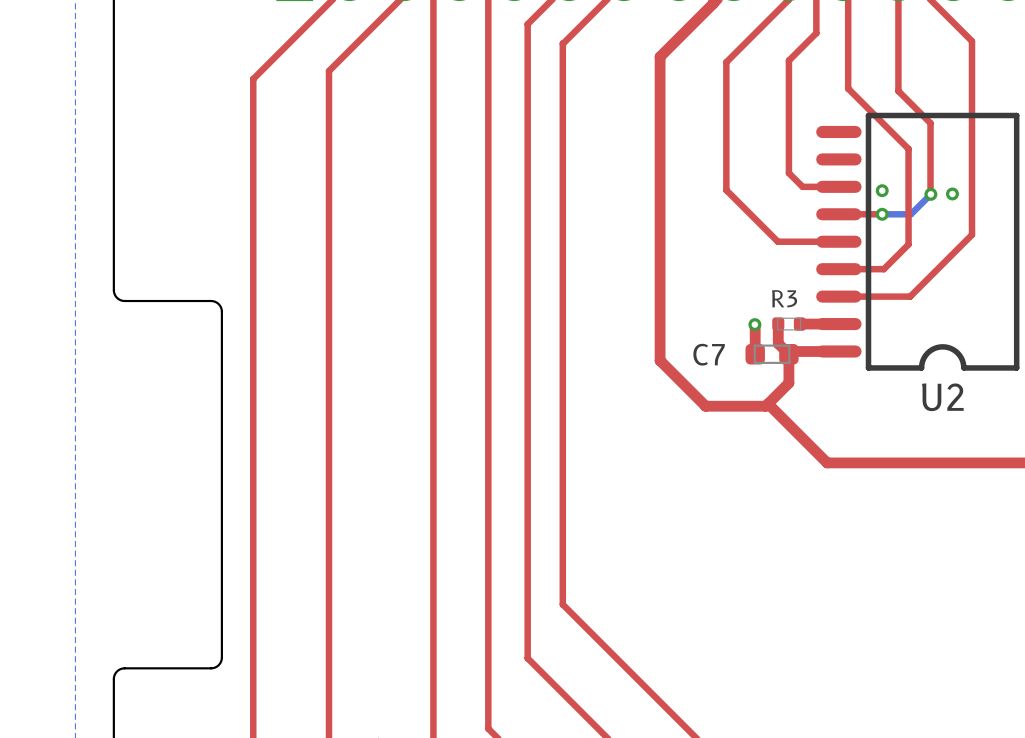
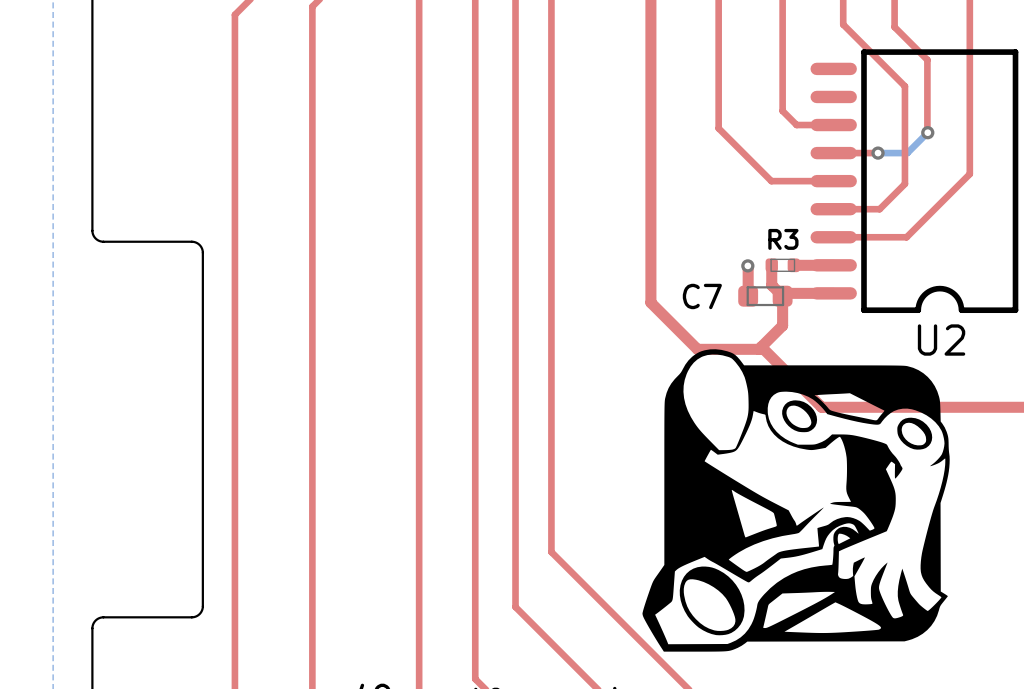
via: (882, 190) -> none
via: (952, 193) -> none
drawing: none -> [642, 349, 950, 652]

